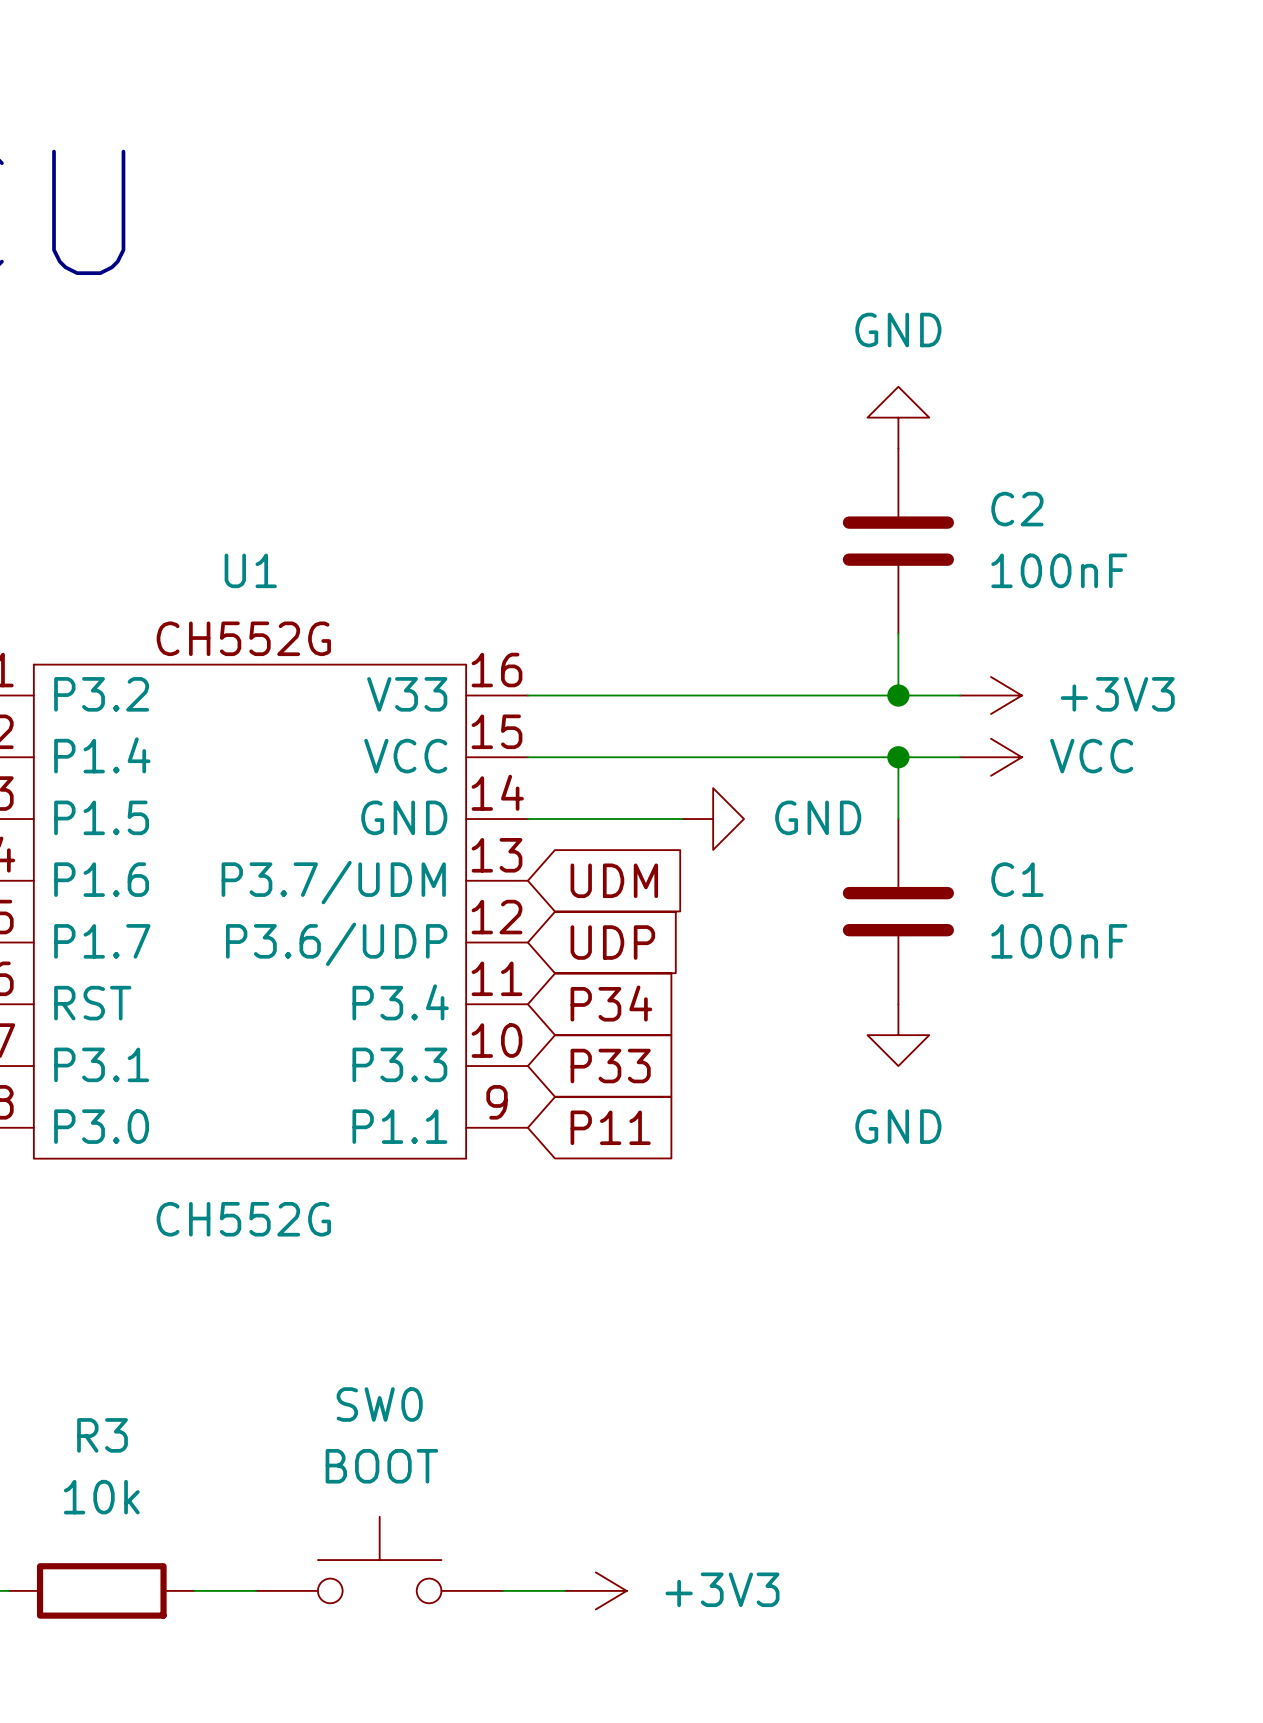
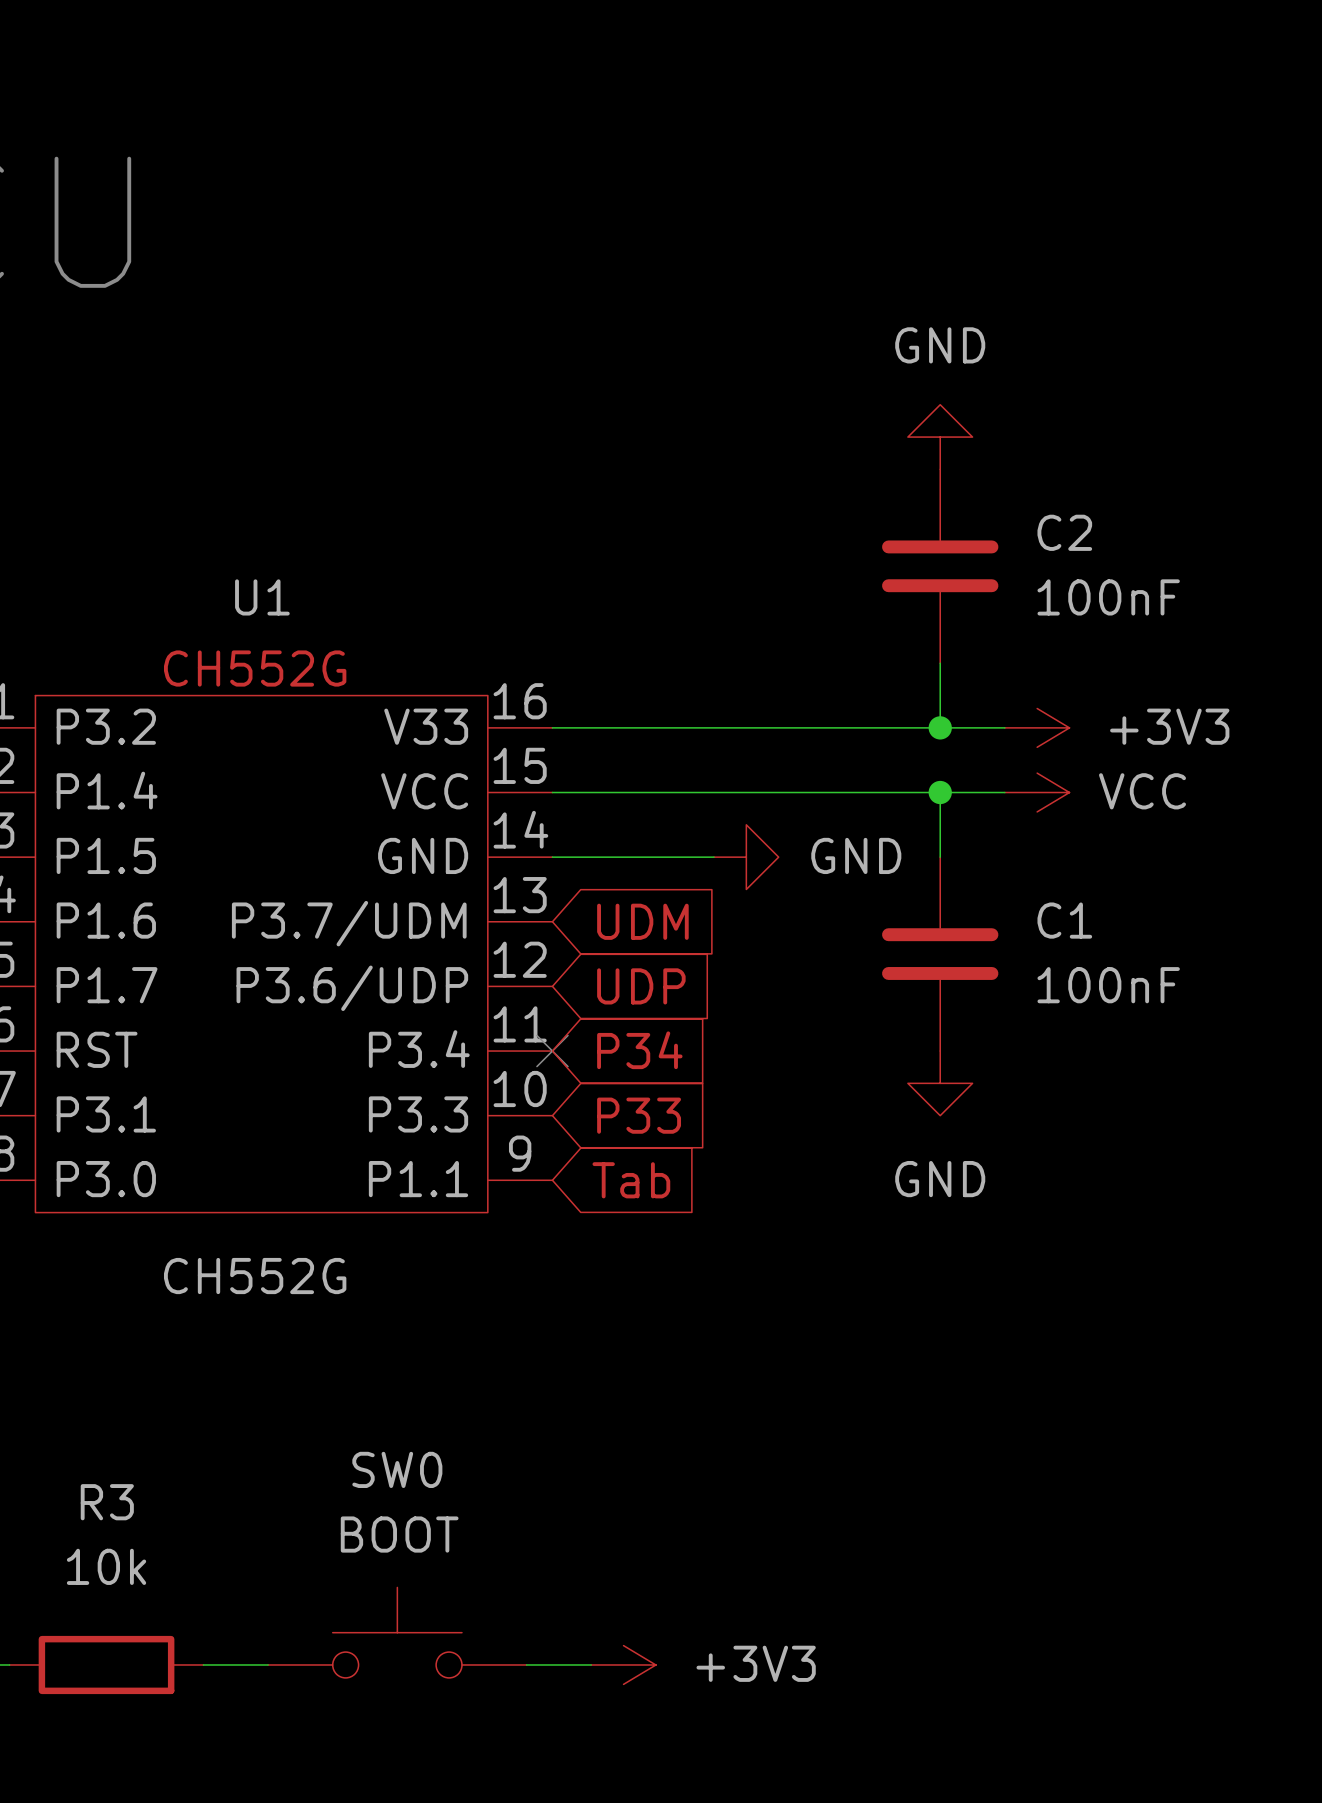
no-connect mark: none -> (552, 1051)
global label: P11 (610, 1127) -> Tab (631, 1180)

